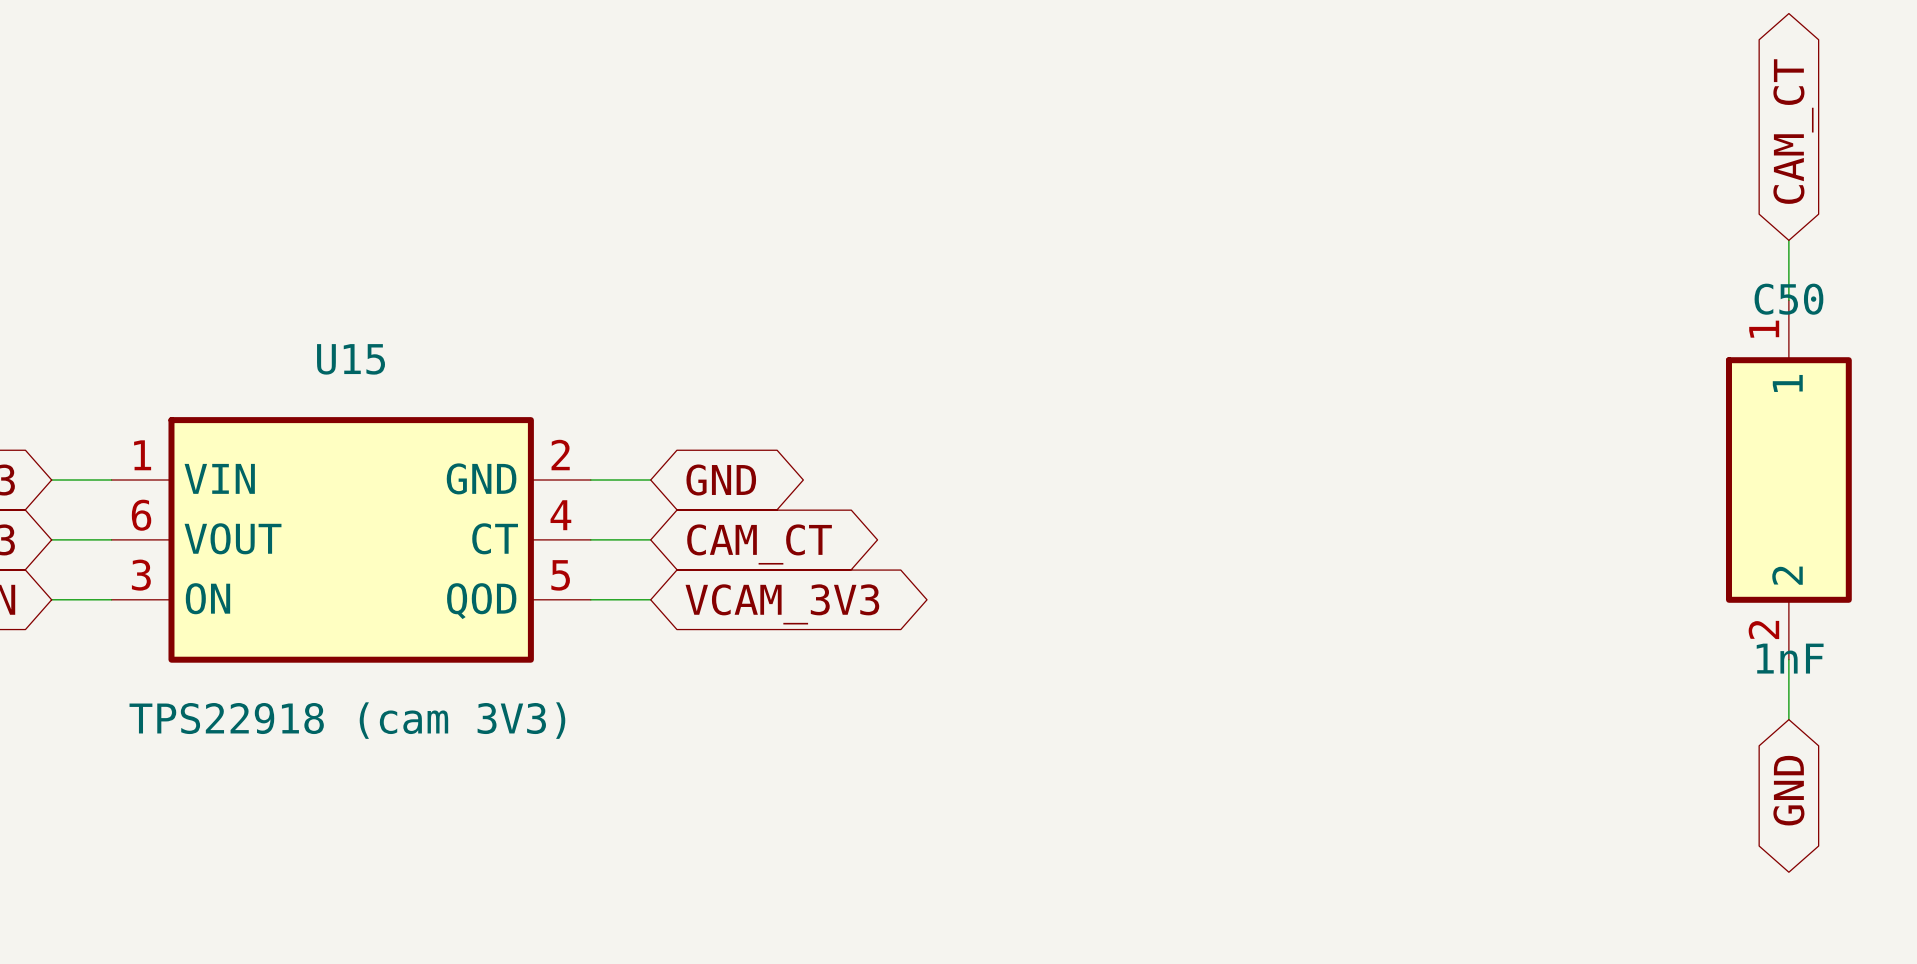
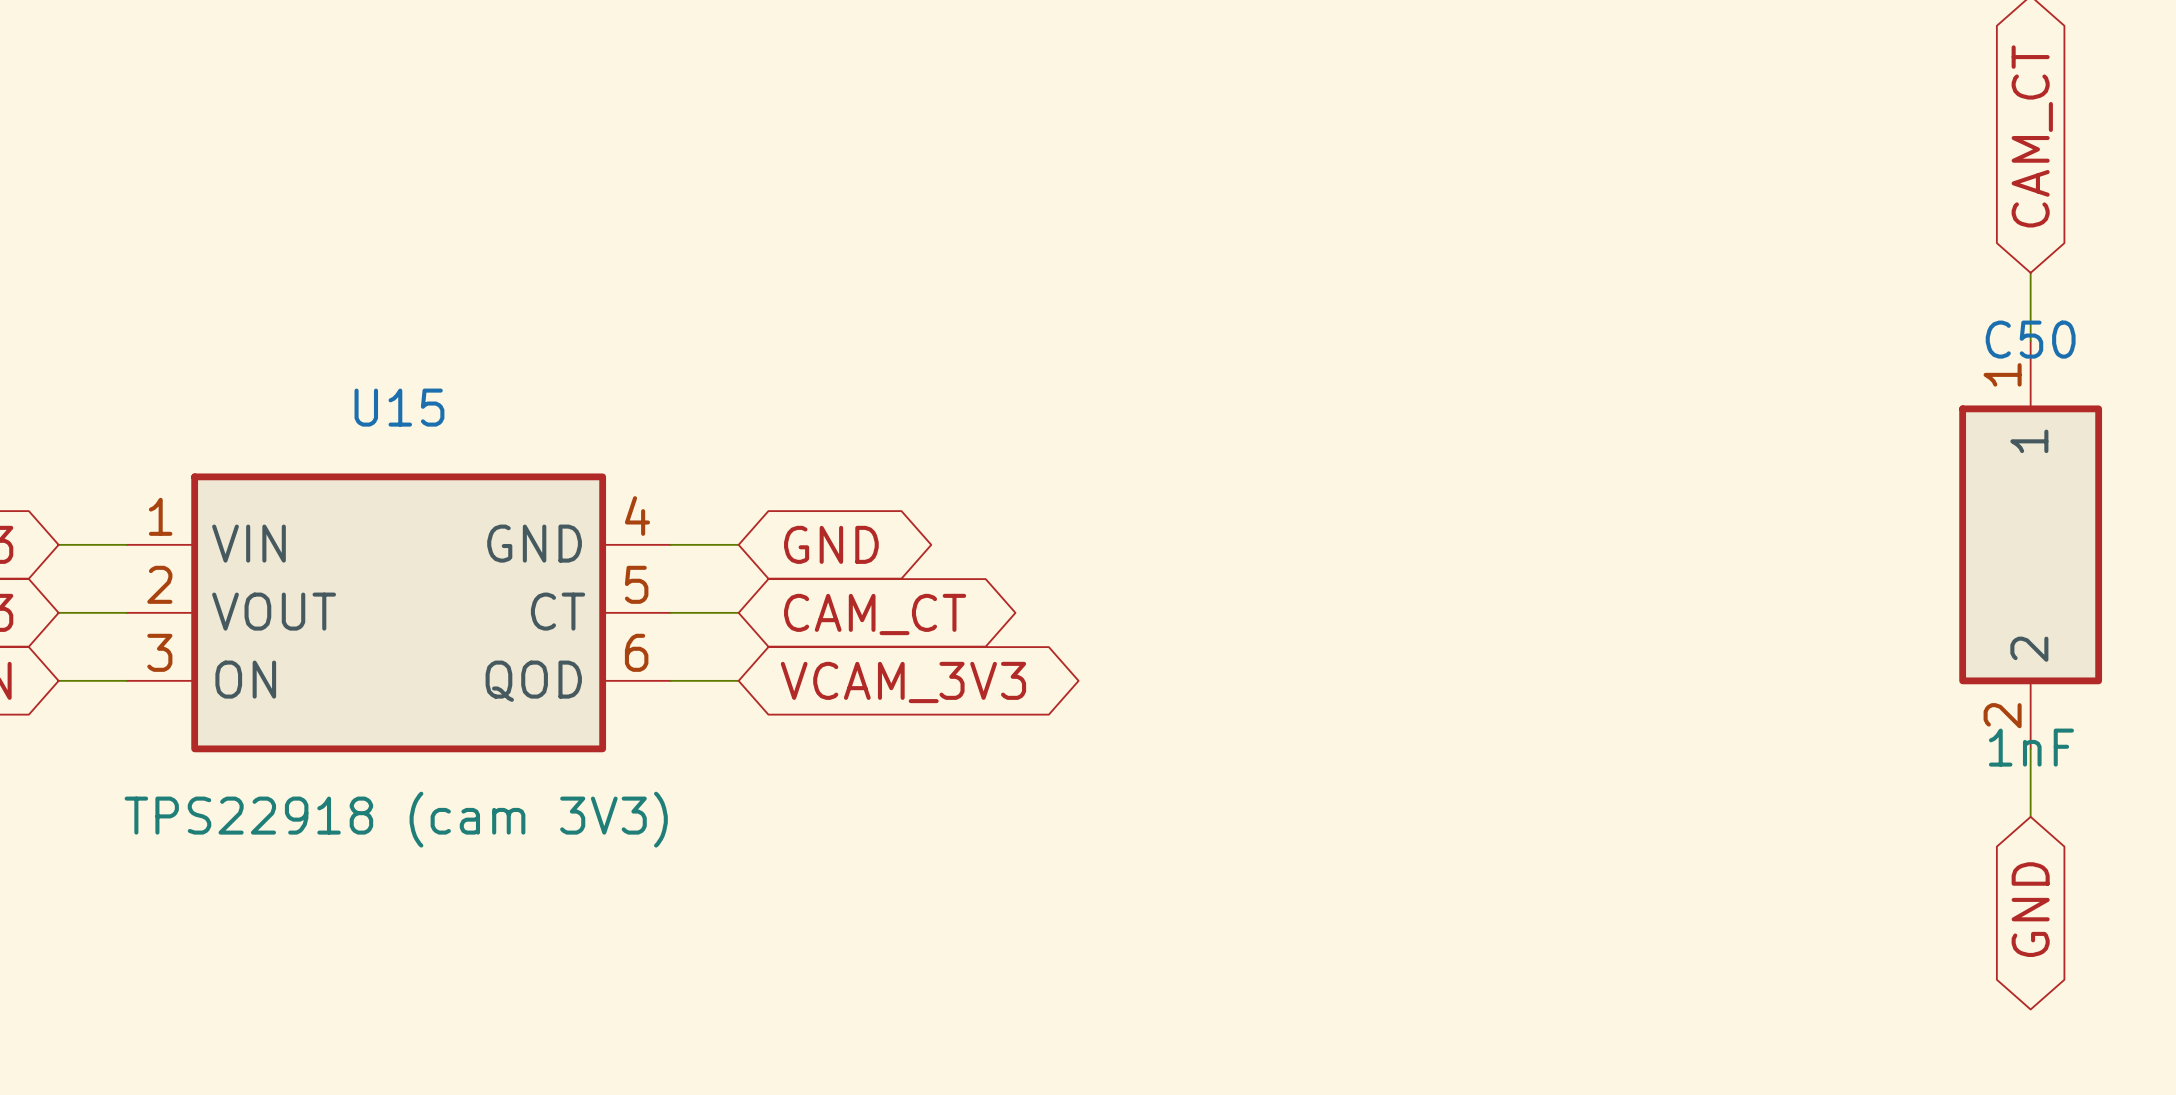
U15 pin number: 2 (560, 455) -> 4 (637, 516)
U15 pin number: 6 (141, 515) -> 2 (159, 584)
U15 pin number: 4 (560, 515) -> 5 (636, 584)
U15 pin number: 5 (560, 575) -> 6 (636, 652)

